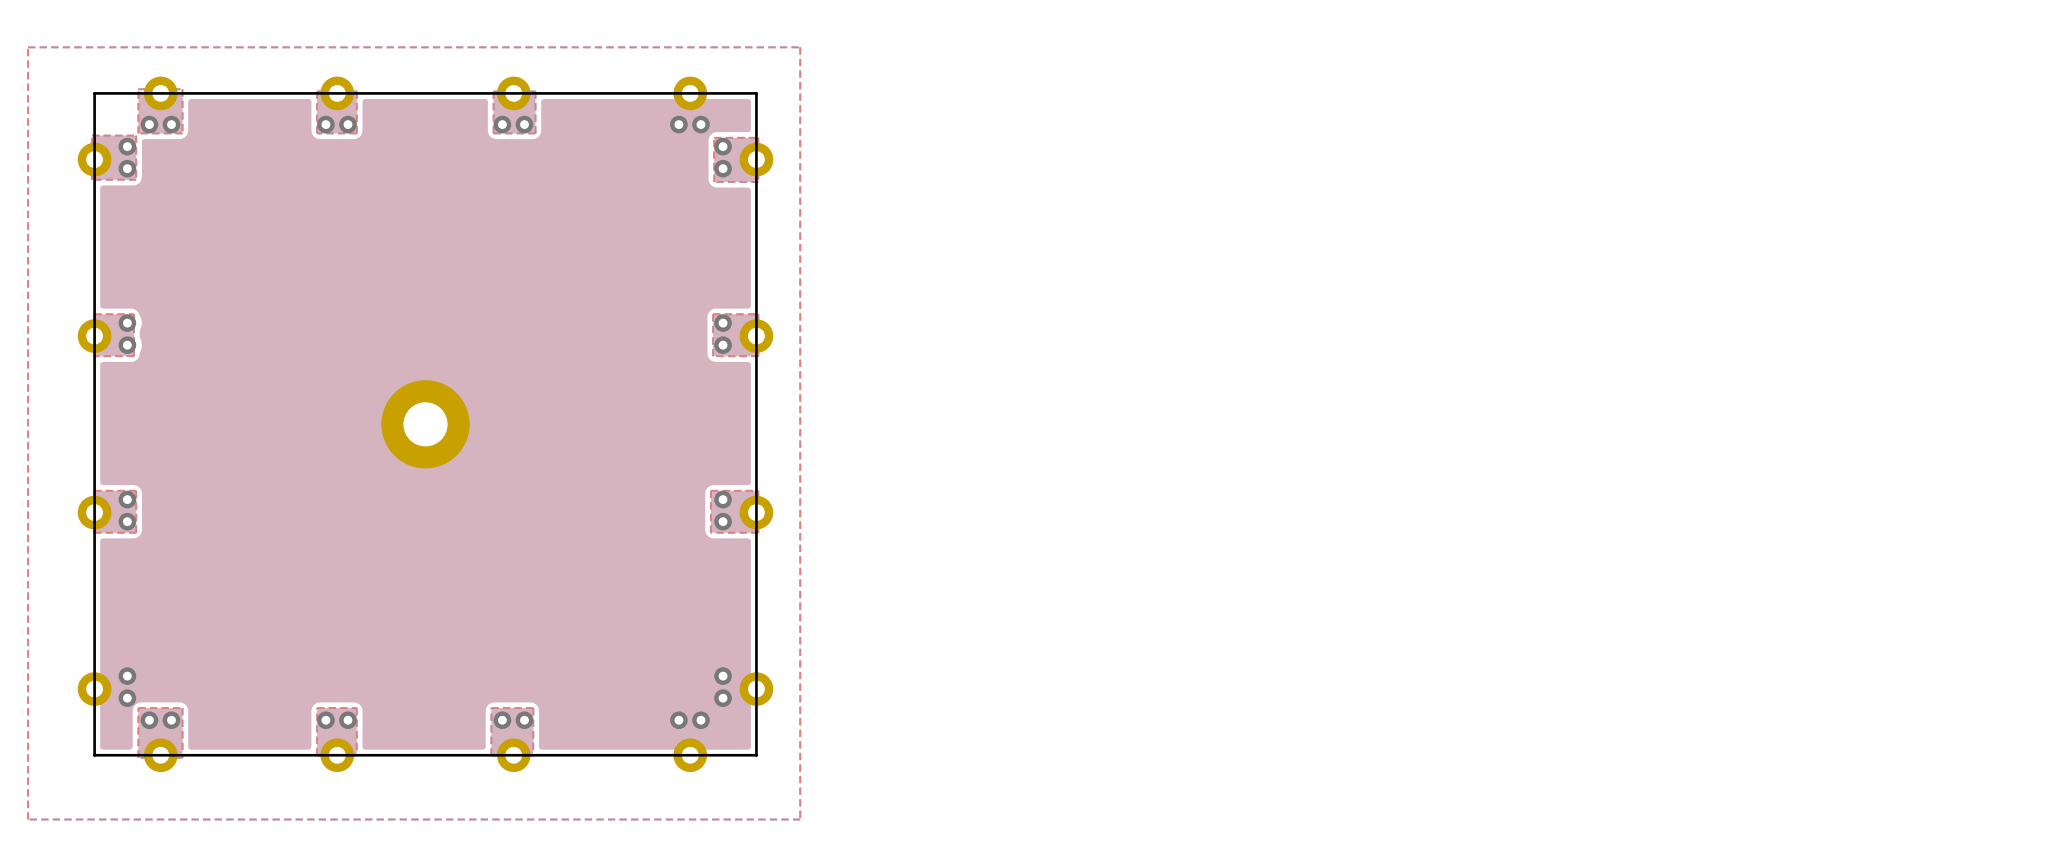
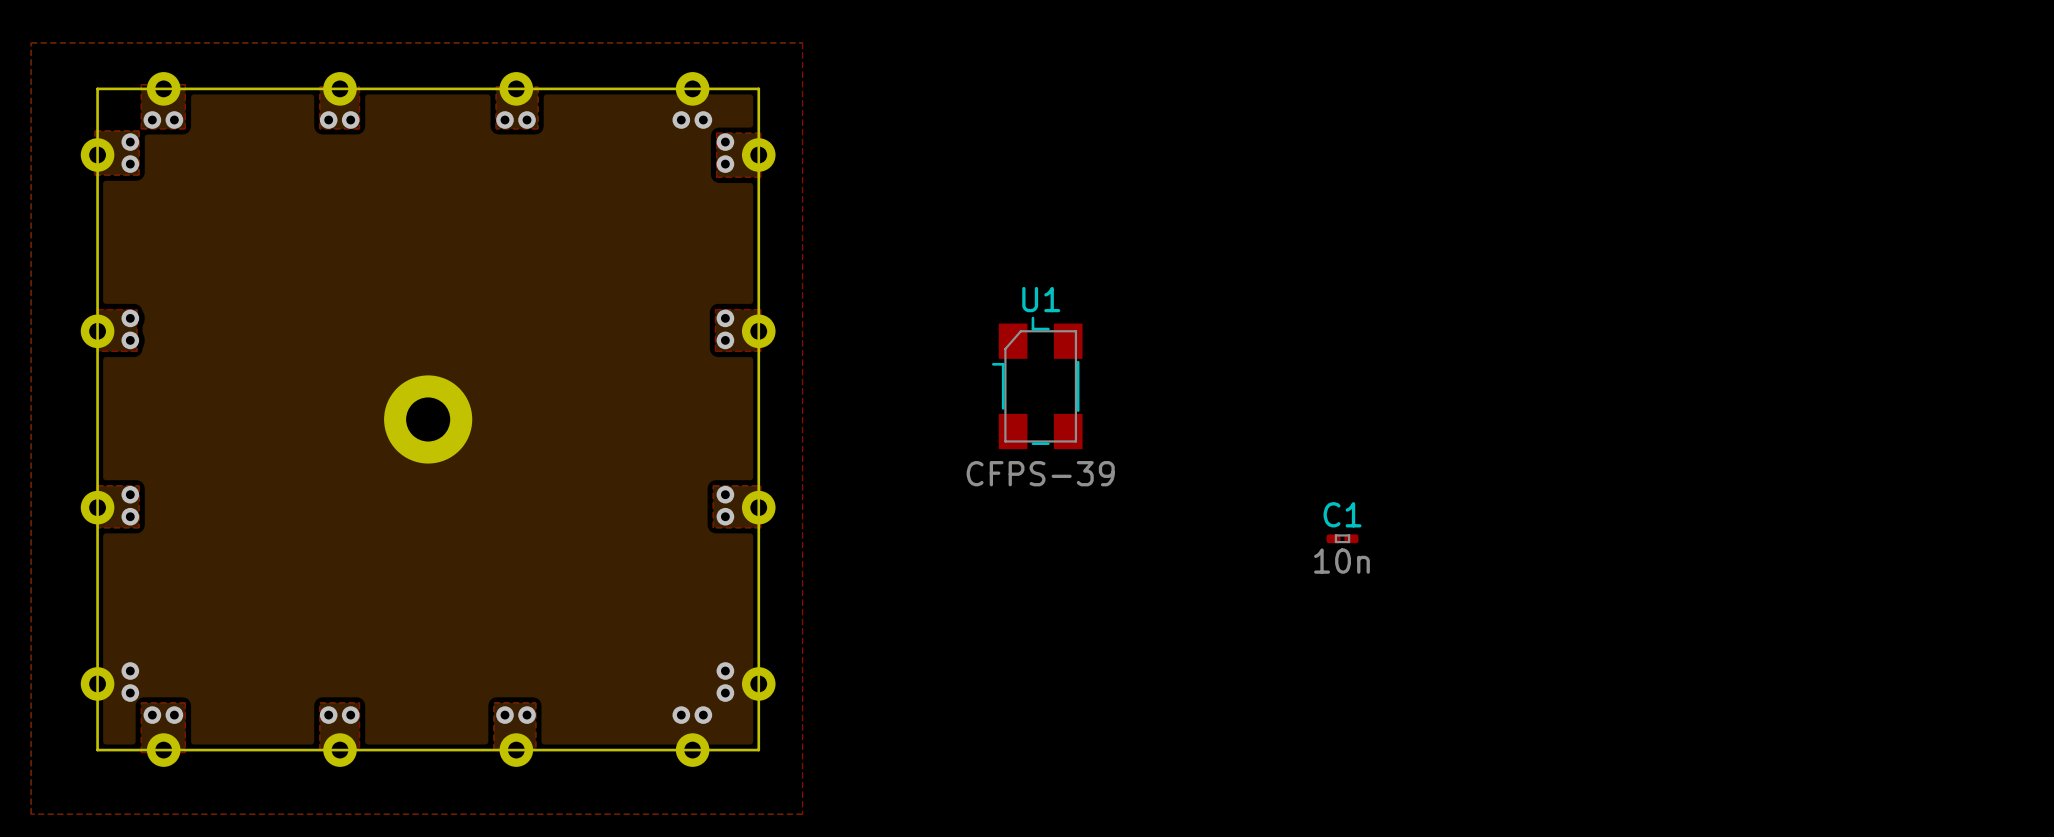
U1: none -> CFPS-39 (1037, 382)
C1: none -> 10n (1342, 538)

